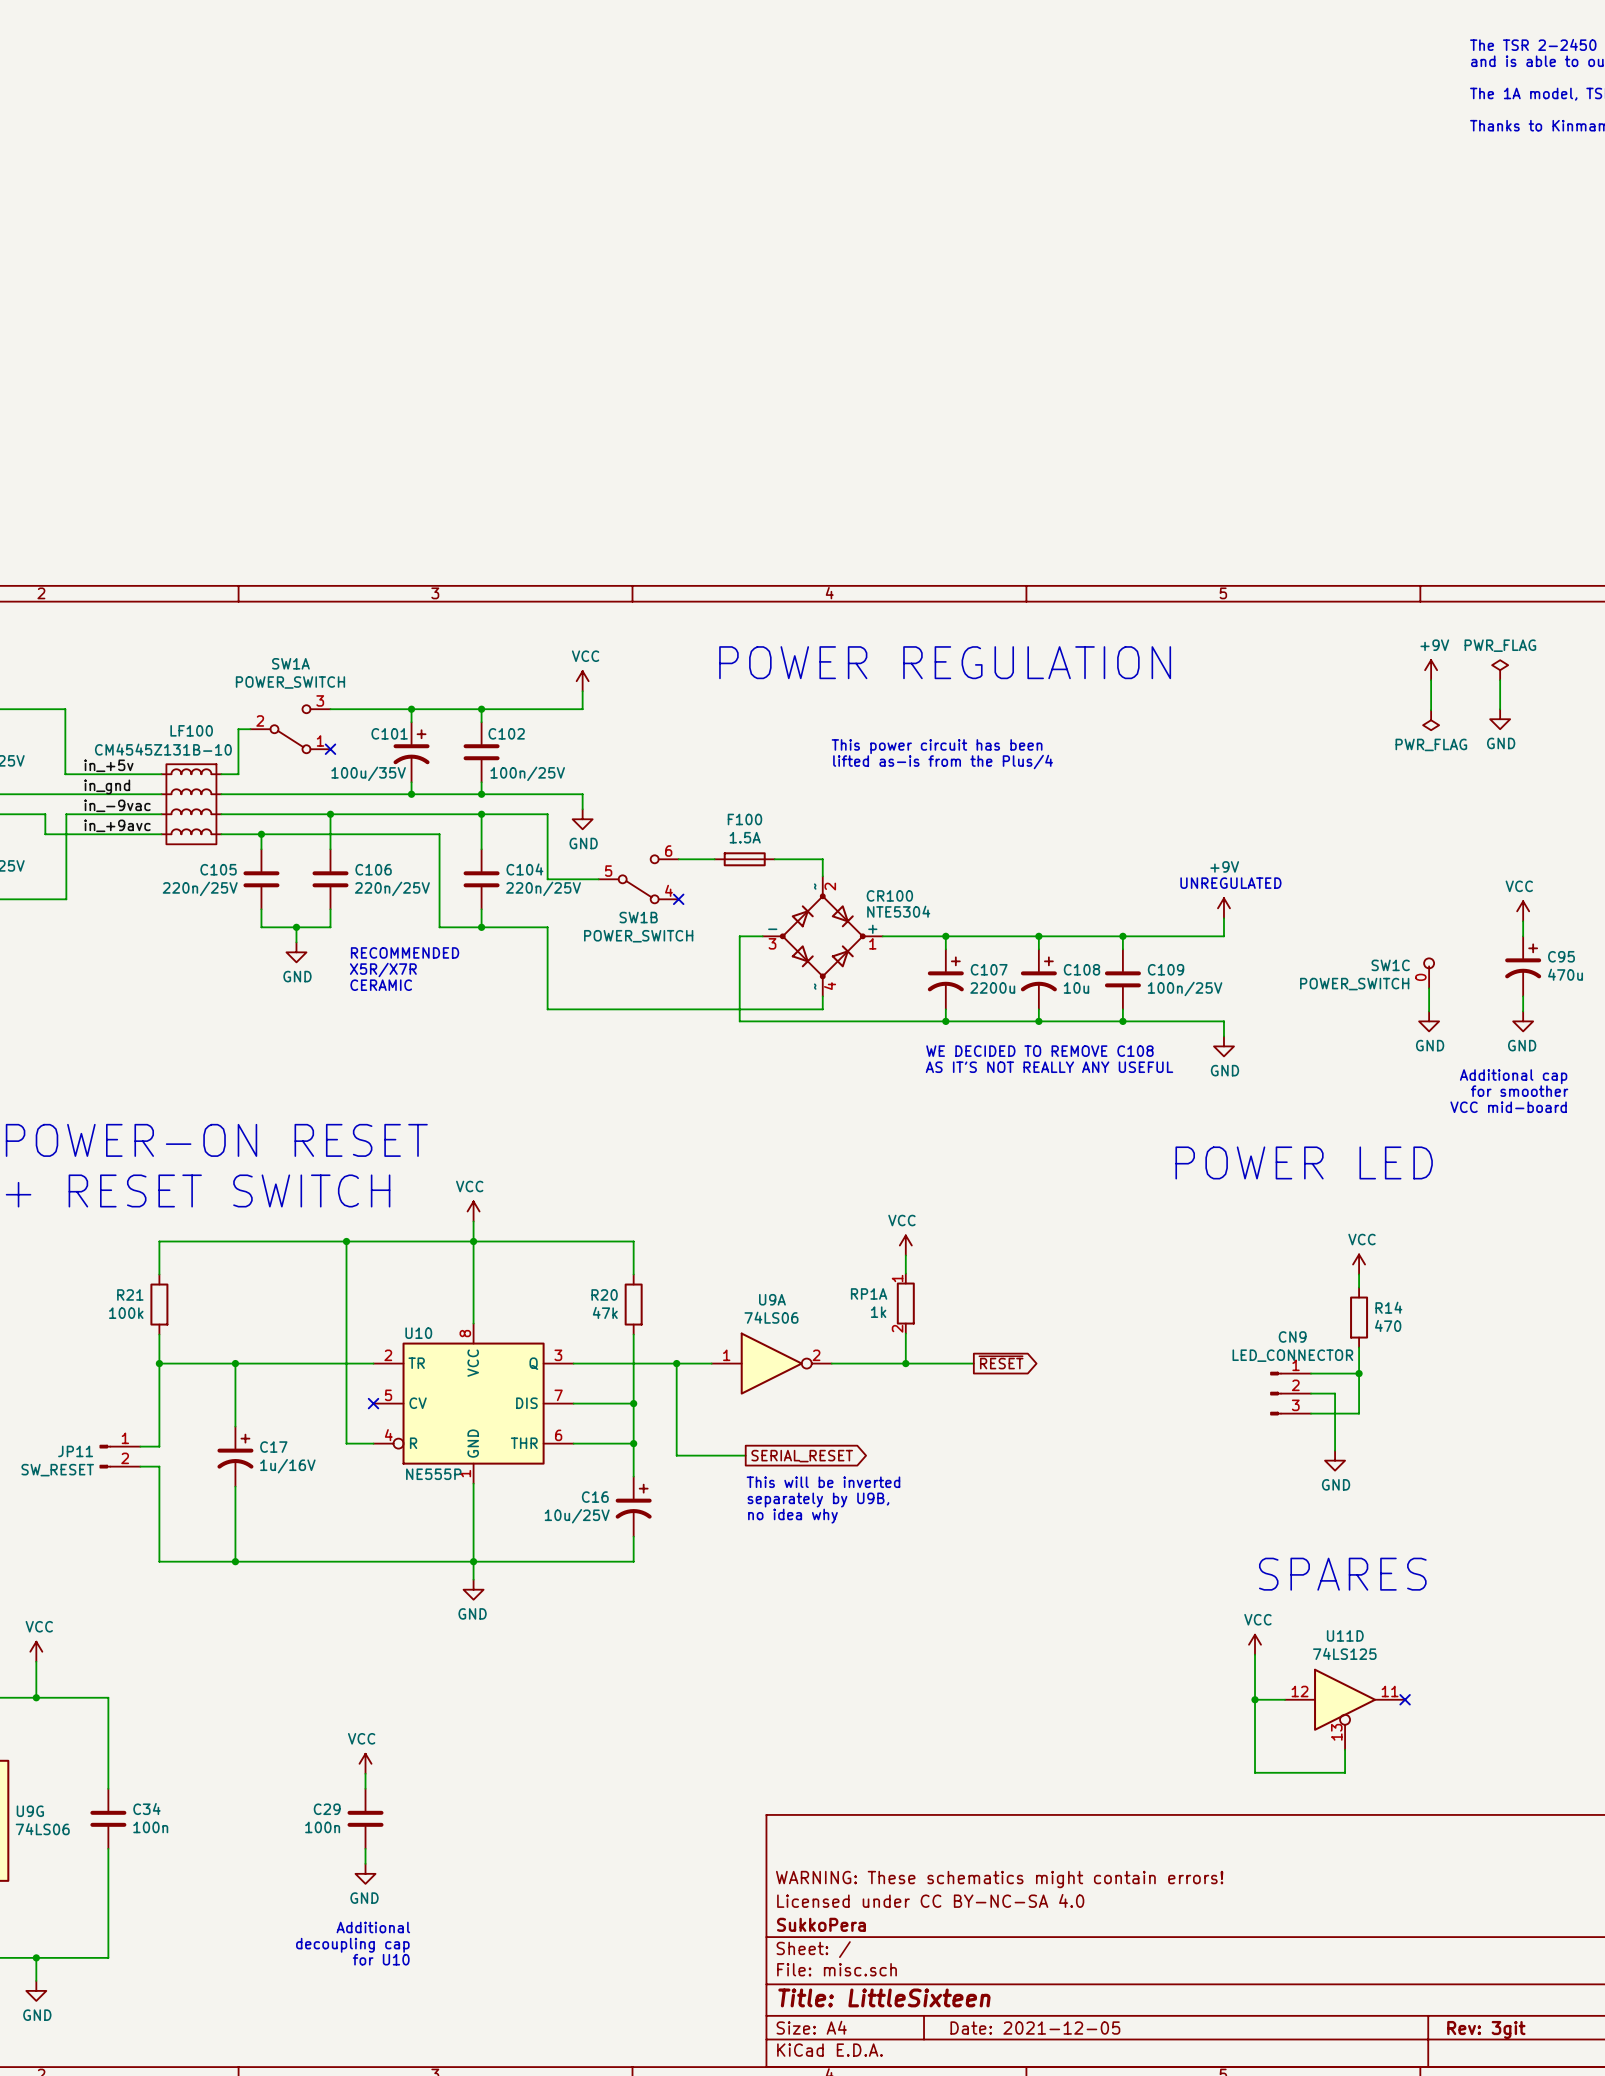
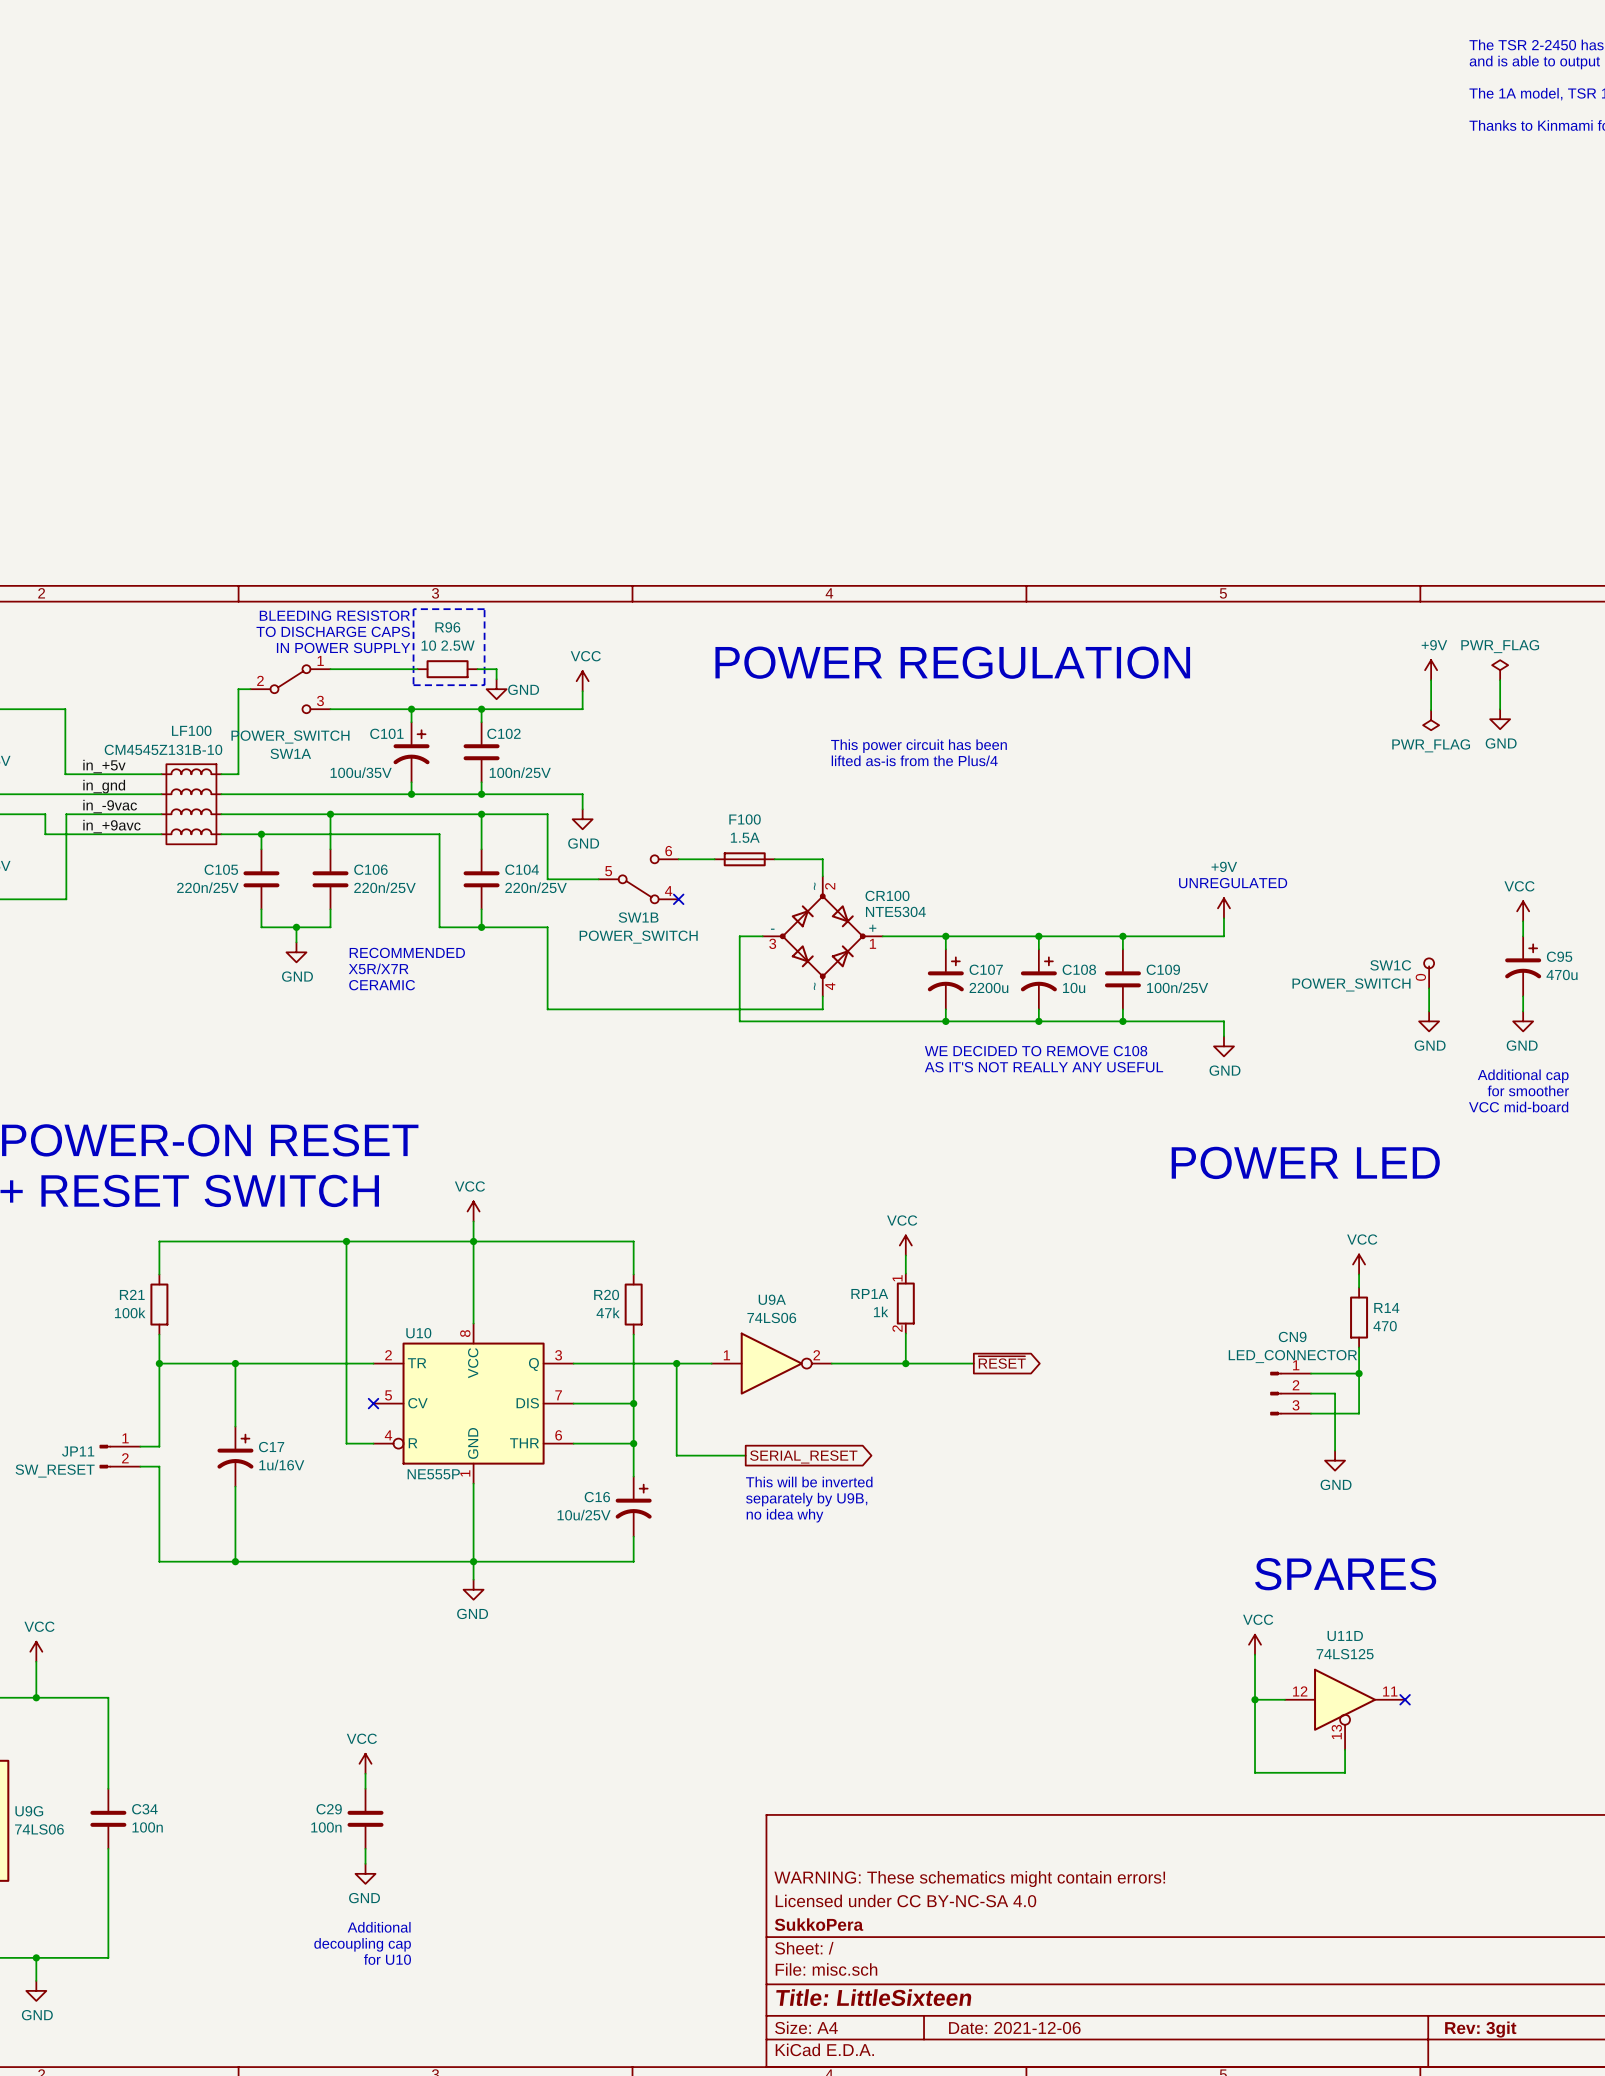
line: none -> (413, 609) (413, 685) (484, 685) (484, 609) (413, 609)
text: none -> BLEEDING RESISTOR (334, 615)
text: none -> TO DISCHARGE CAPS (333, 631)
text: none -> IN POWER SUPPLY (343, 647)
wire: none -> (330, 669) (417, 669)
R96: none -> 10 2.5W (447, 669)
wire: none -> (477, 669) (496, 669) (496, 679)
power symbol: none -> GND (496, 689)
wire: (238, 729) (250, 729) -> (238, 729) (238, 689) (250, 689)
SW1A flip: as is (290, 729) -> up-down (290, 689)
no-connect mark: (330, 749) -> none
title block: Date: 2021-12-05 (1035, 2028) -> Date: 2021-12-06 (1014, 2028)

